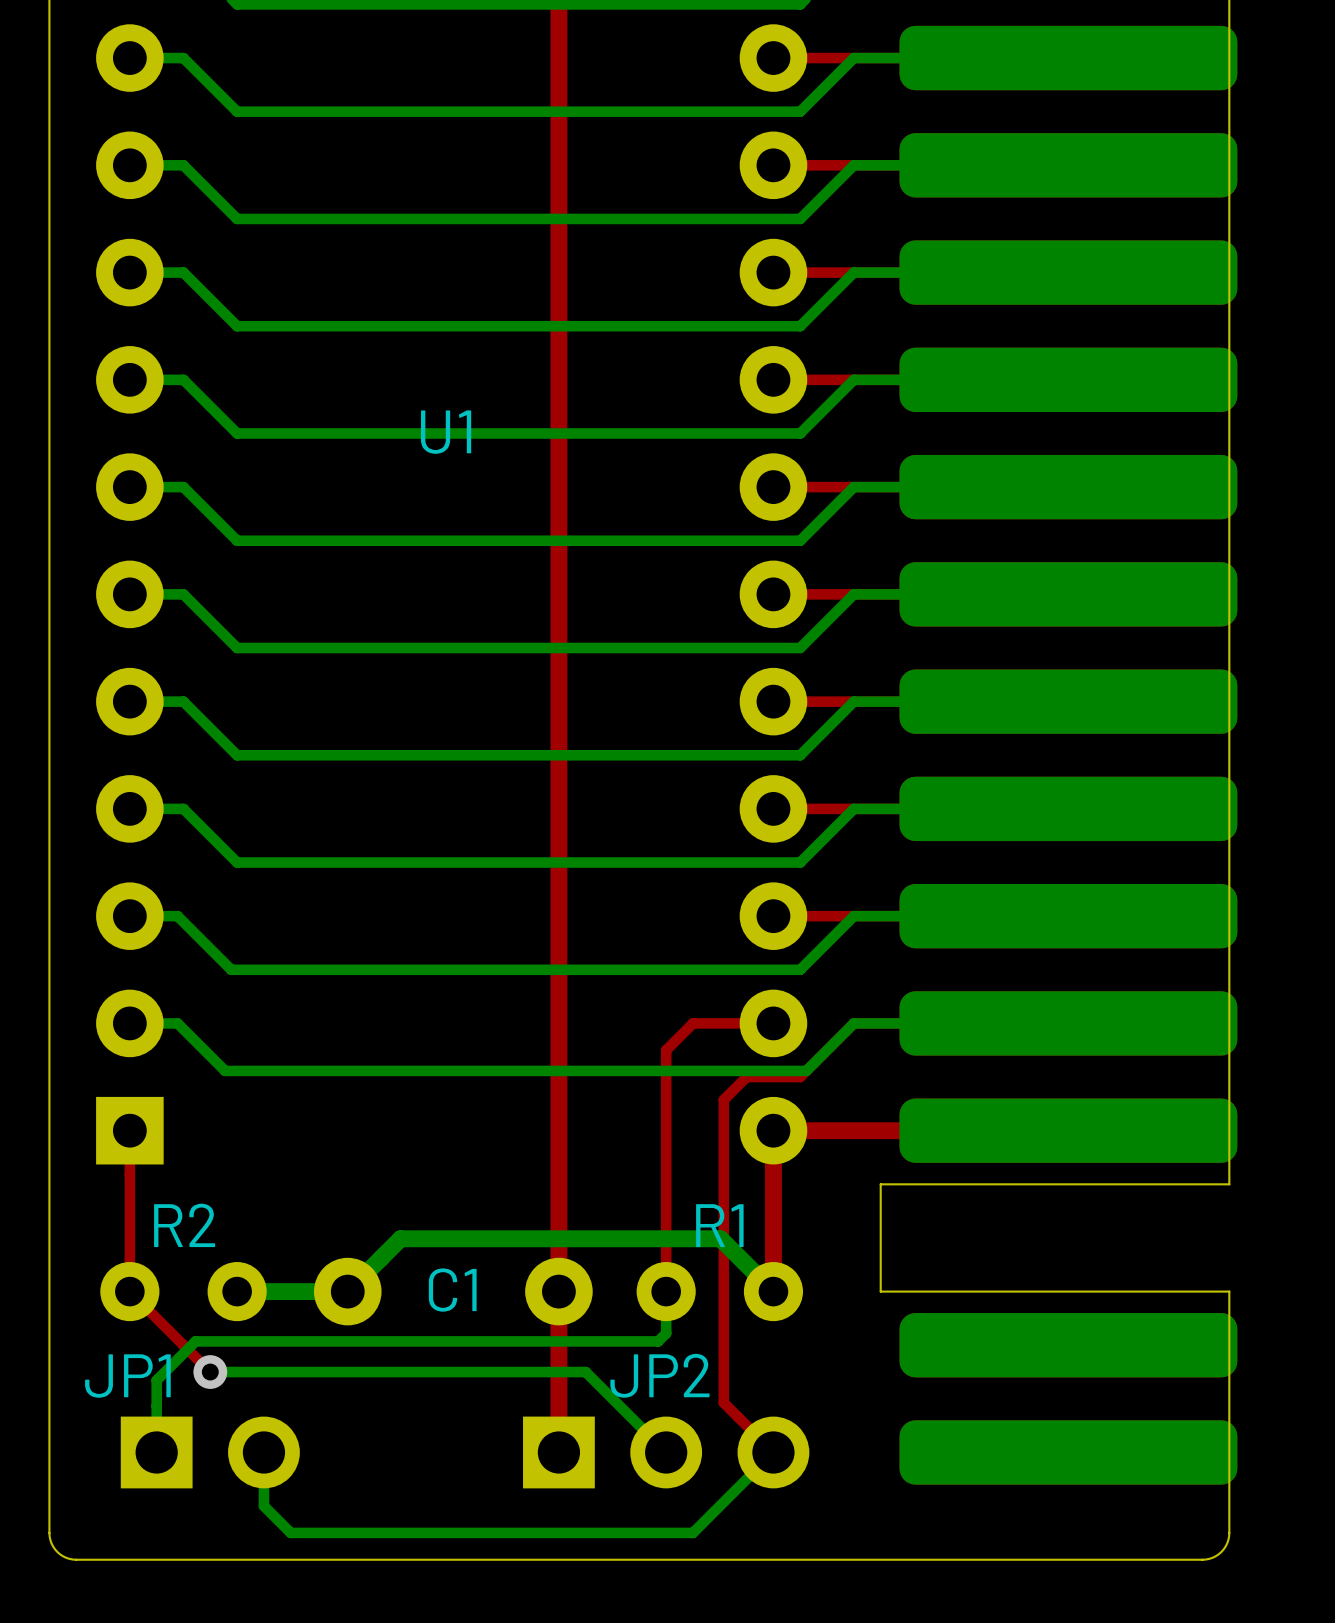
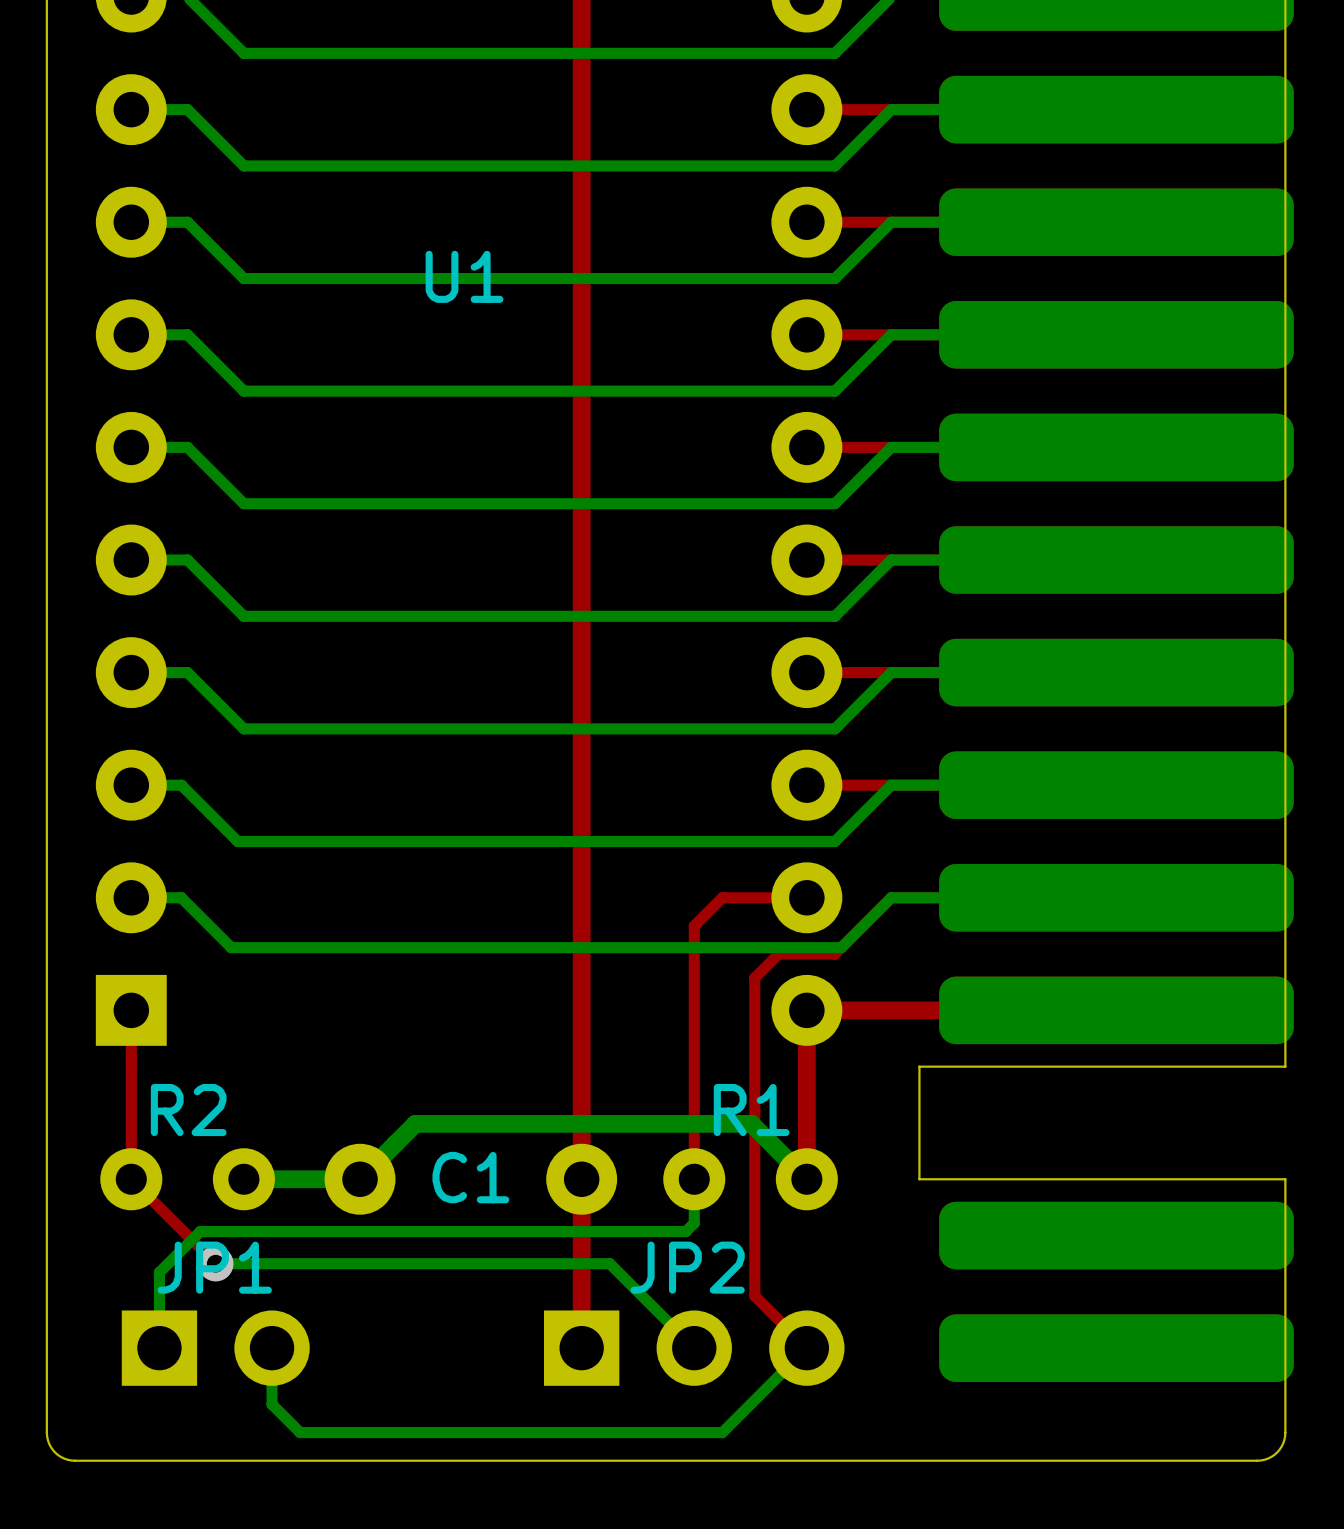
JP1 name position: JP1 (127, 1376) -> JP1 (214, 1267)

